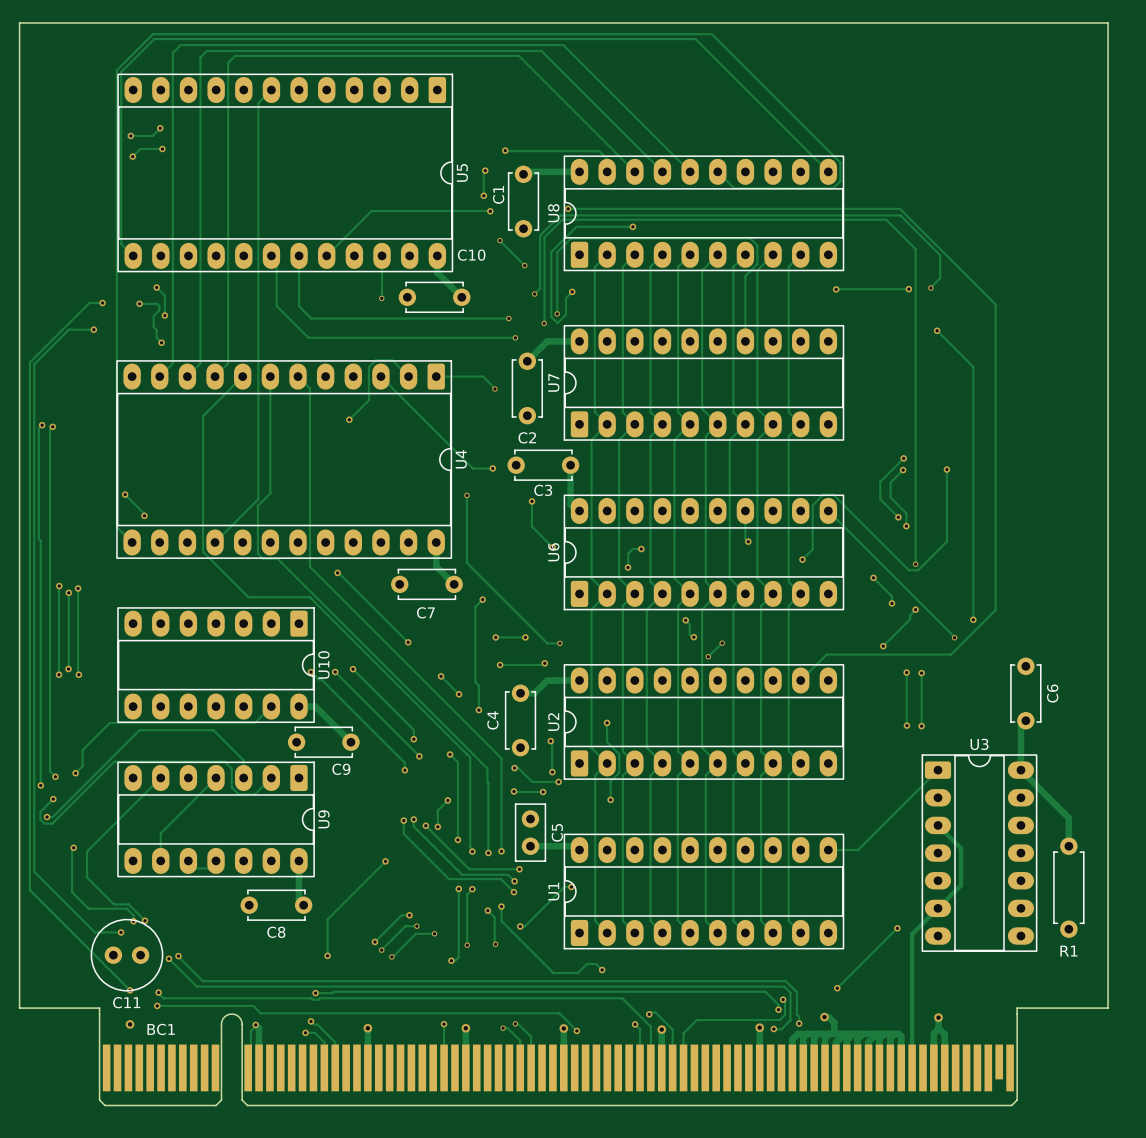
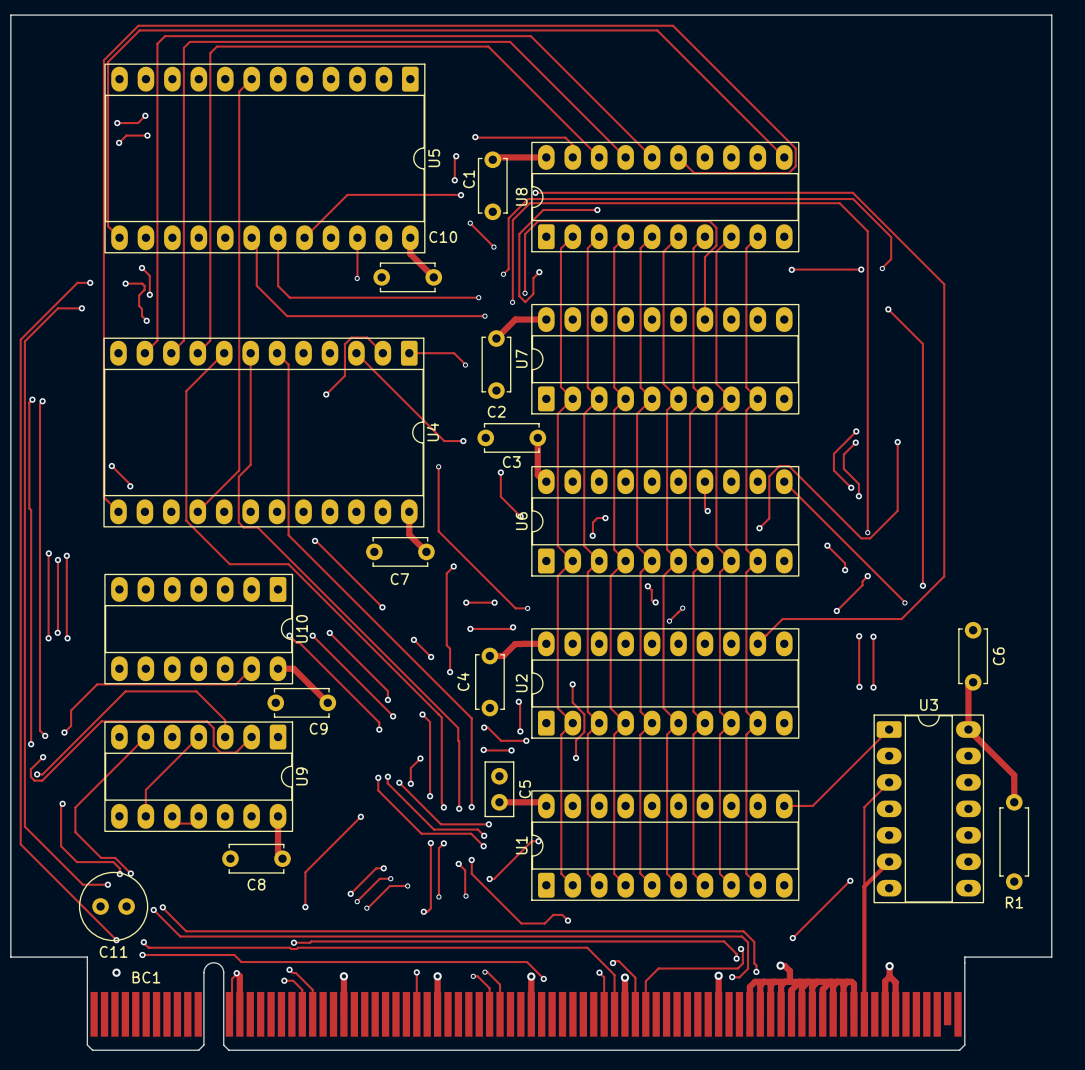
track: (938, 825) (961, 848) (961, 885) (938, 908) -> (889, 782) (864, 807) (864, 886)

